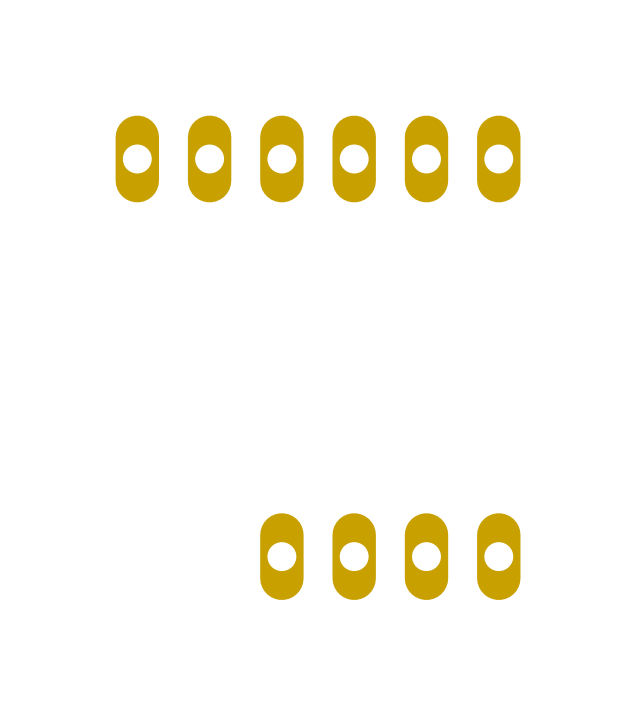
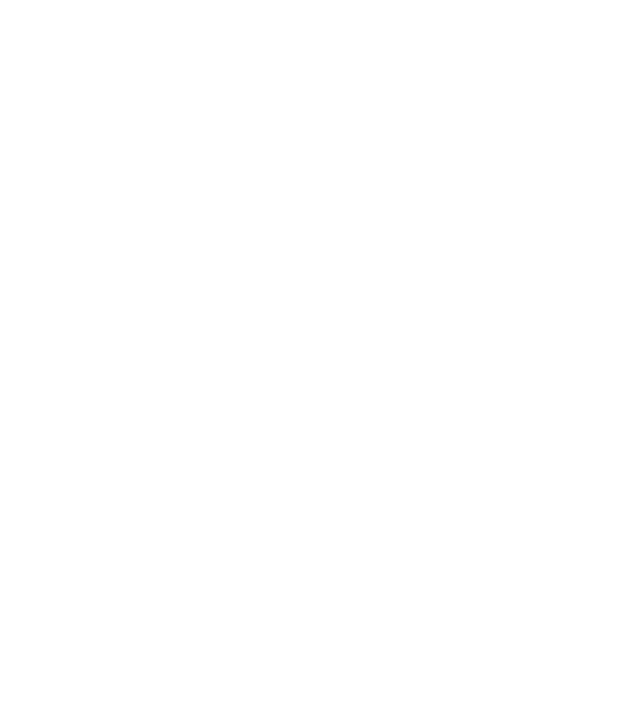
part: (318, 158) -> none
part: (390, 556) -> none

